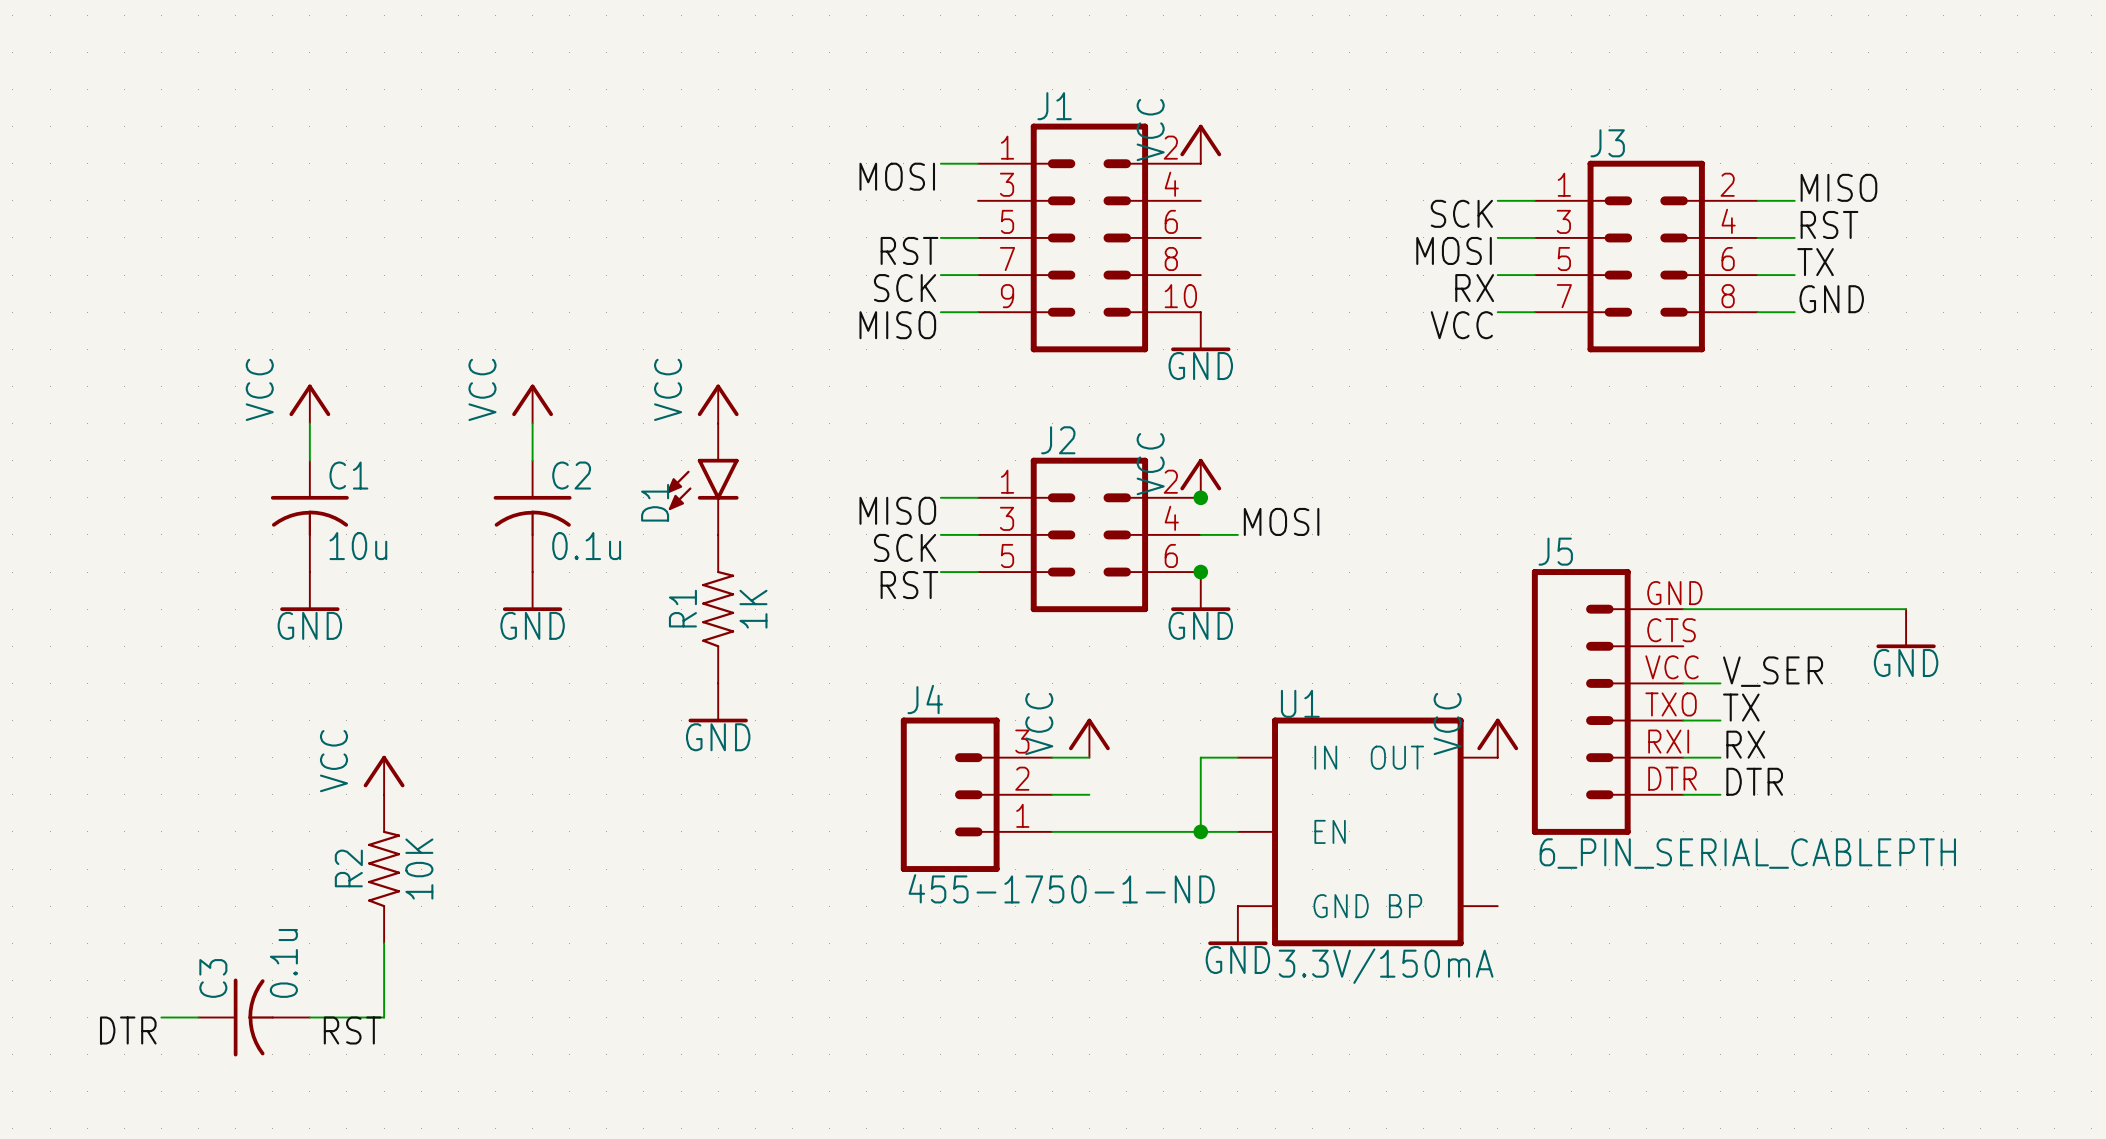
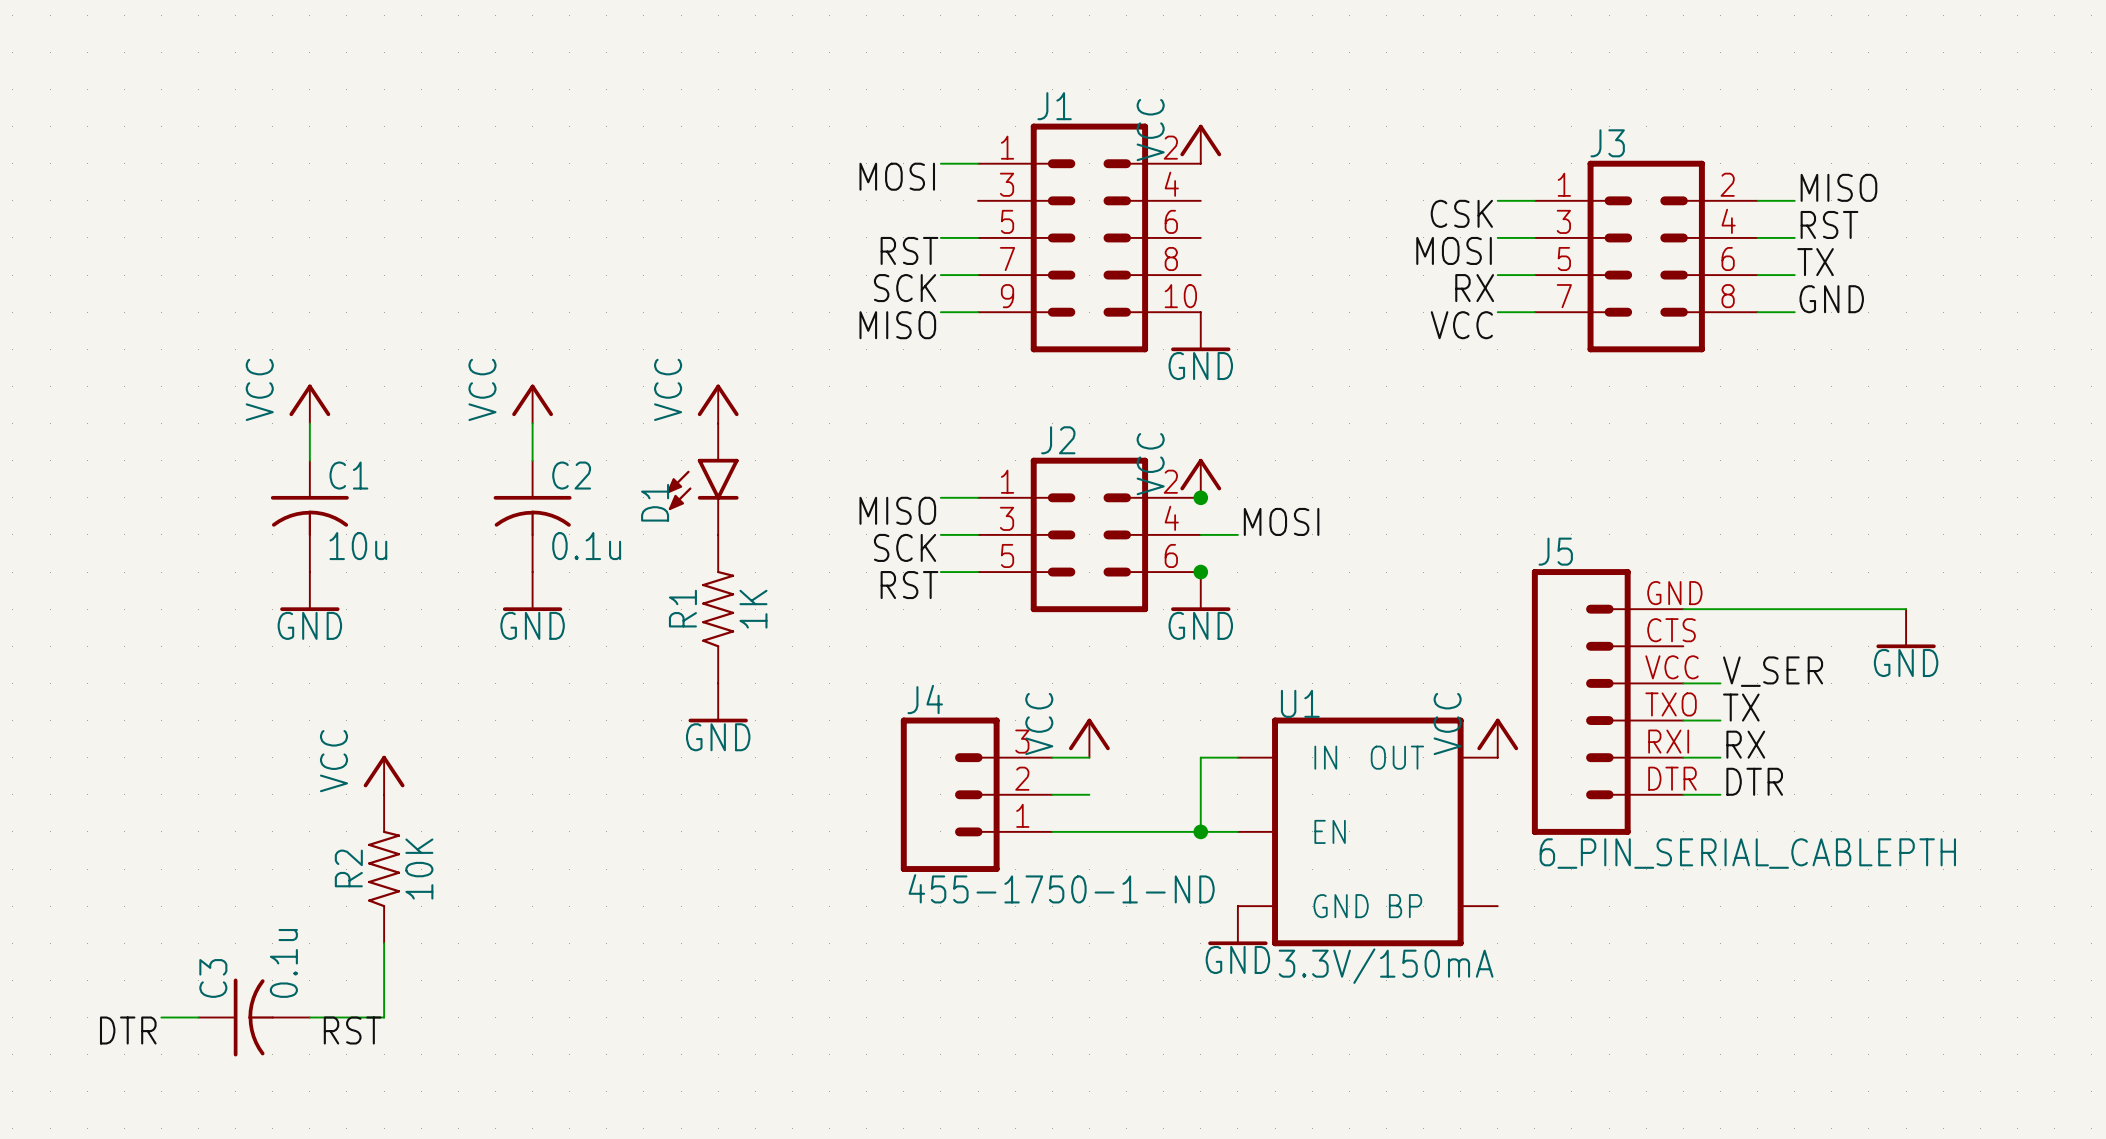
label: SCK (1461, 213) -> CSK (1461, 213)

